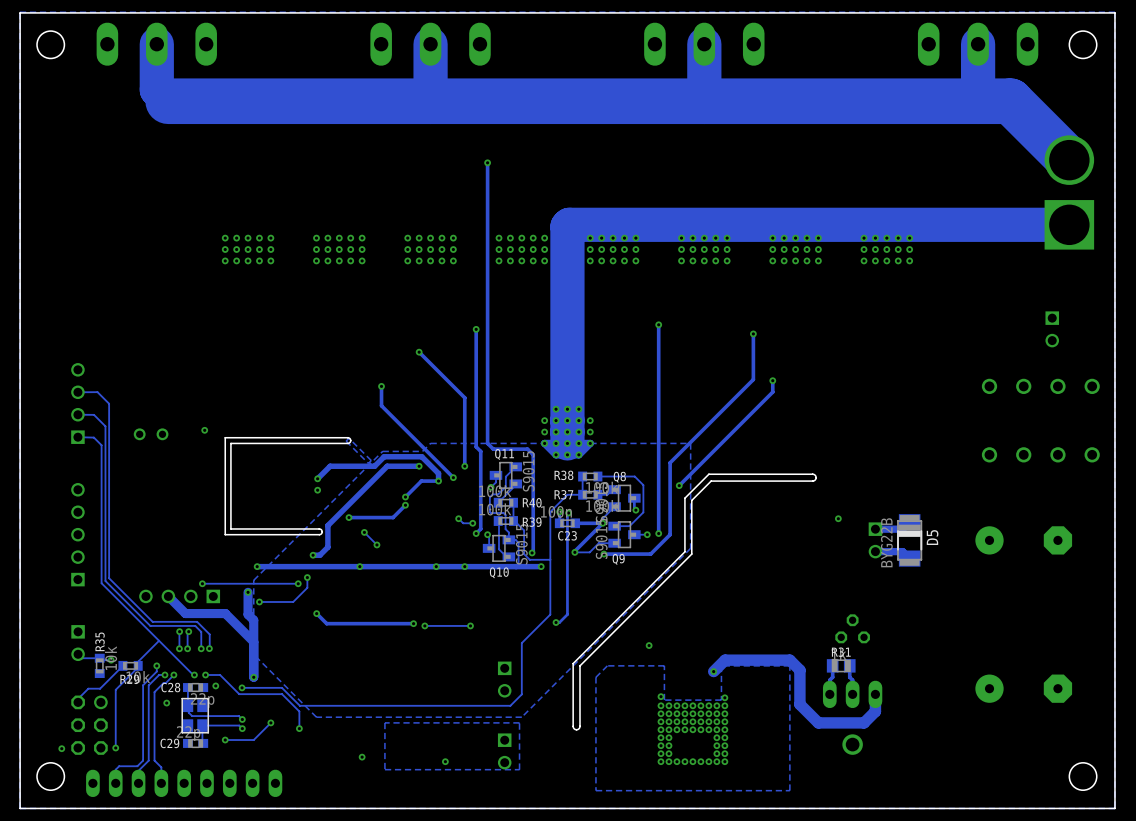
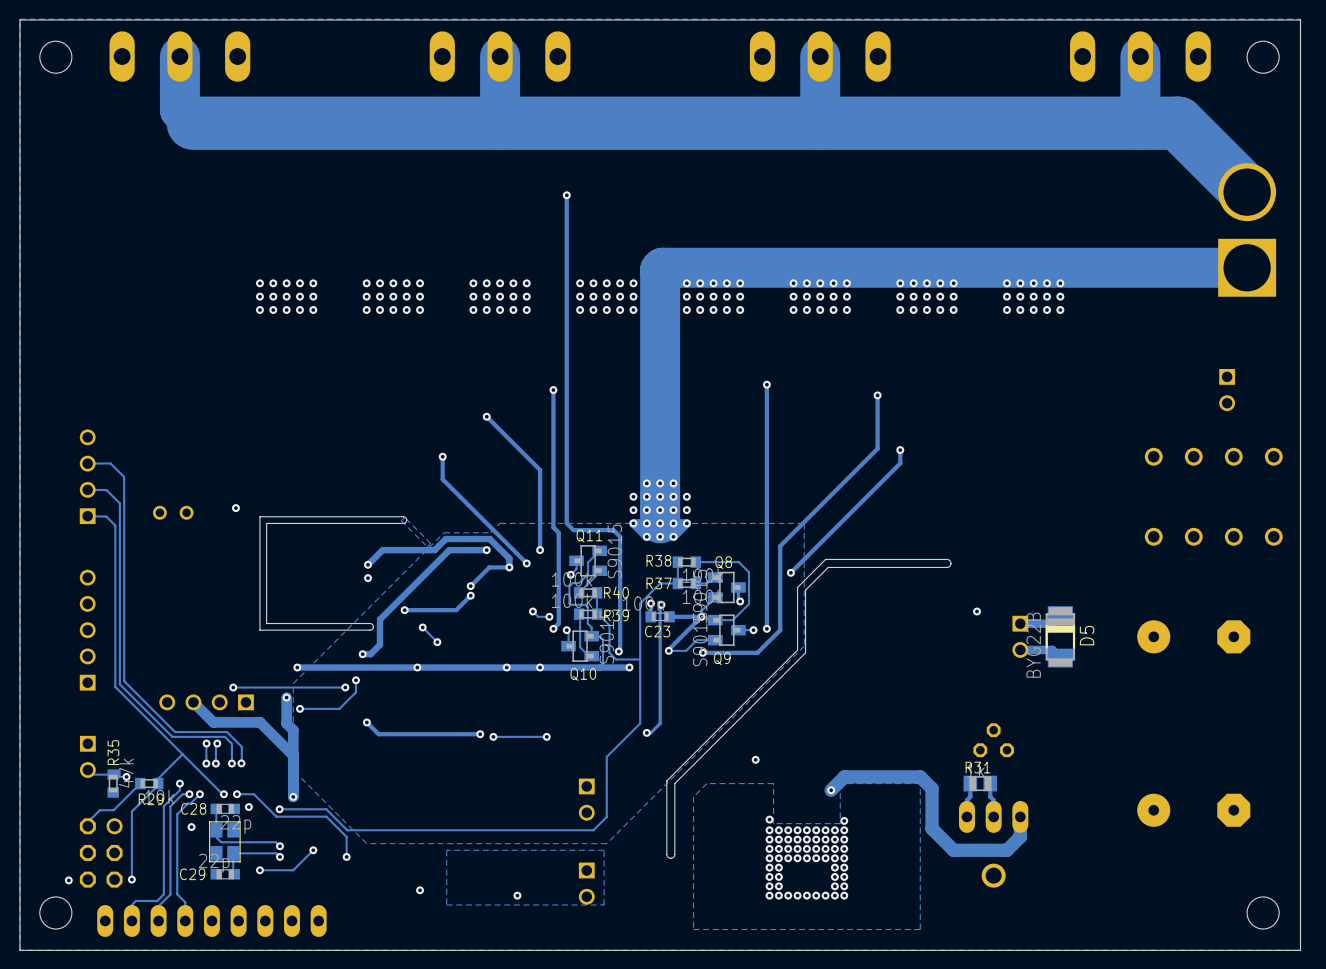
R35 value: 10k (111, 658) -> 47k (126, 773)

